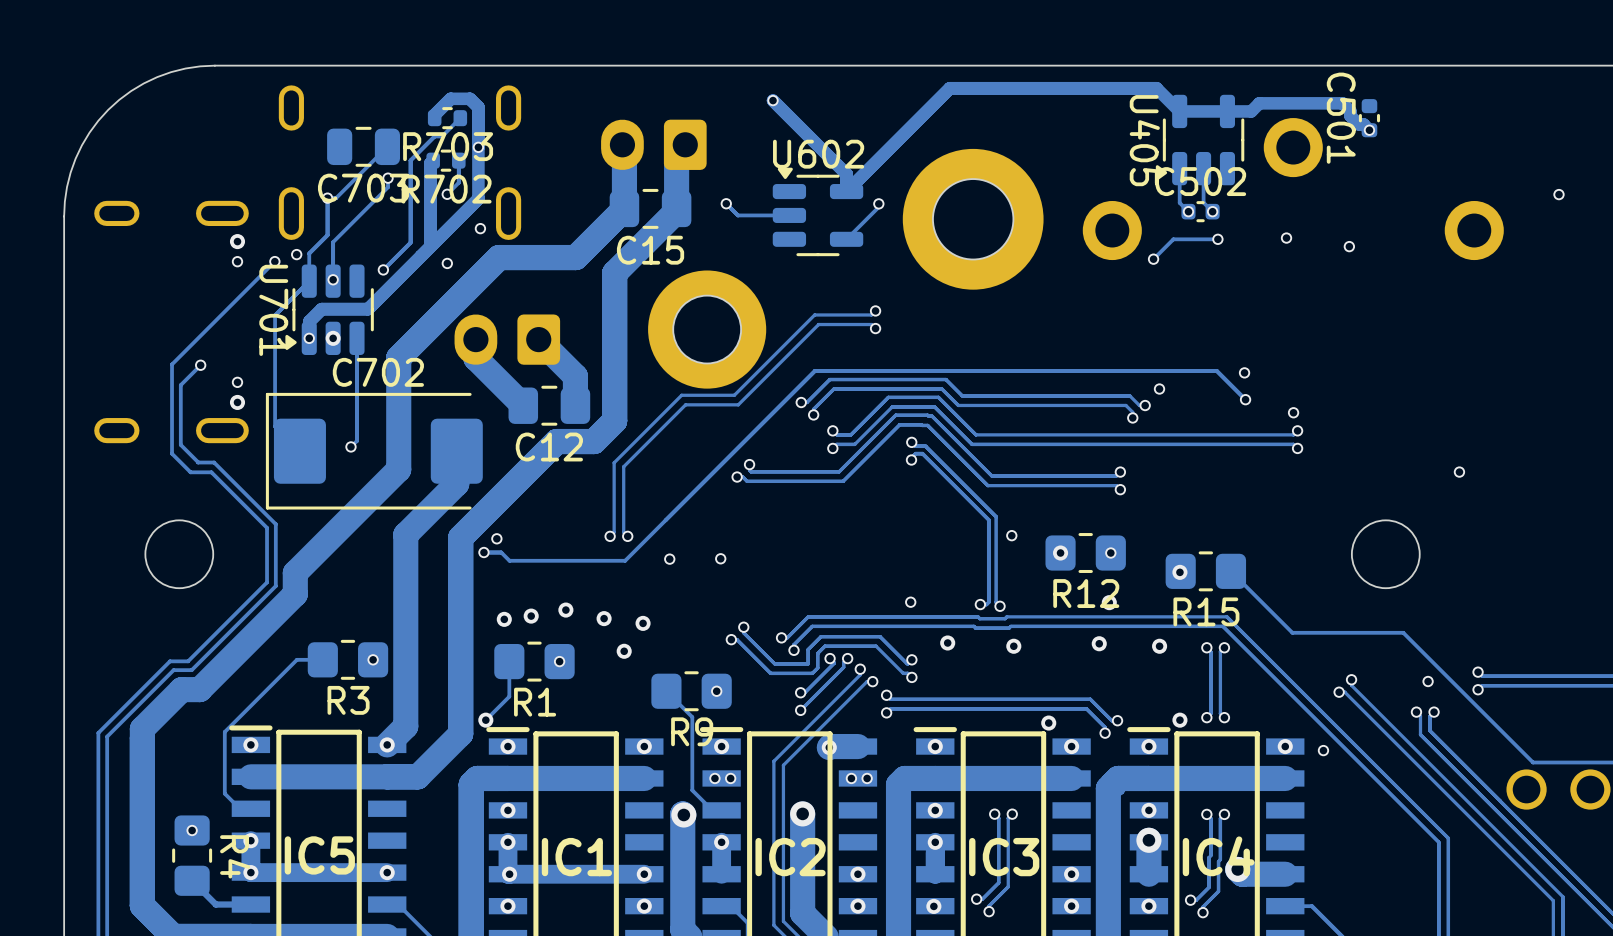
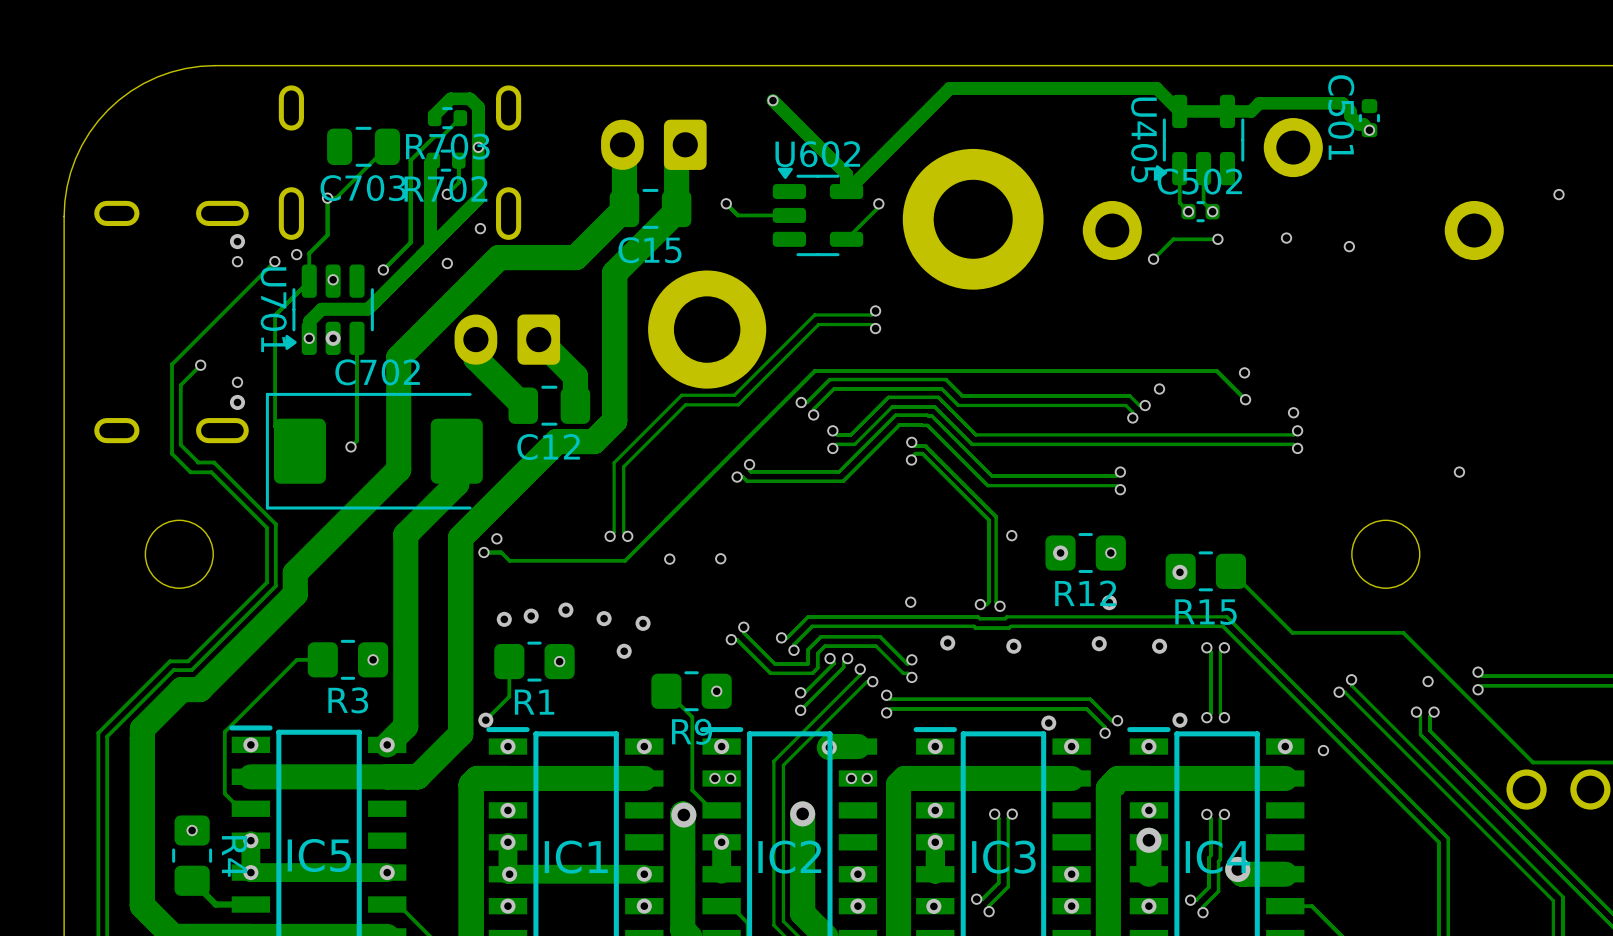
track: (388, 178) (388, 187) (333, 242) (333, 279) -> none
via: (388, 178) -> none

